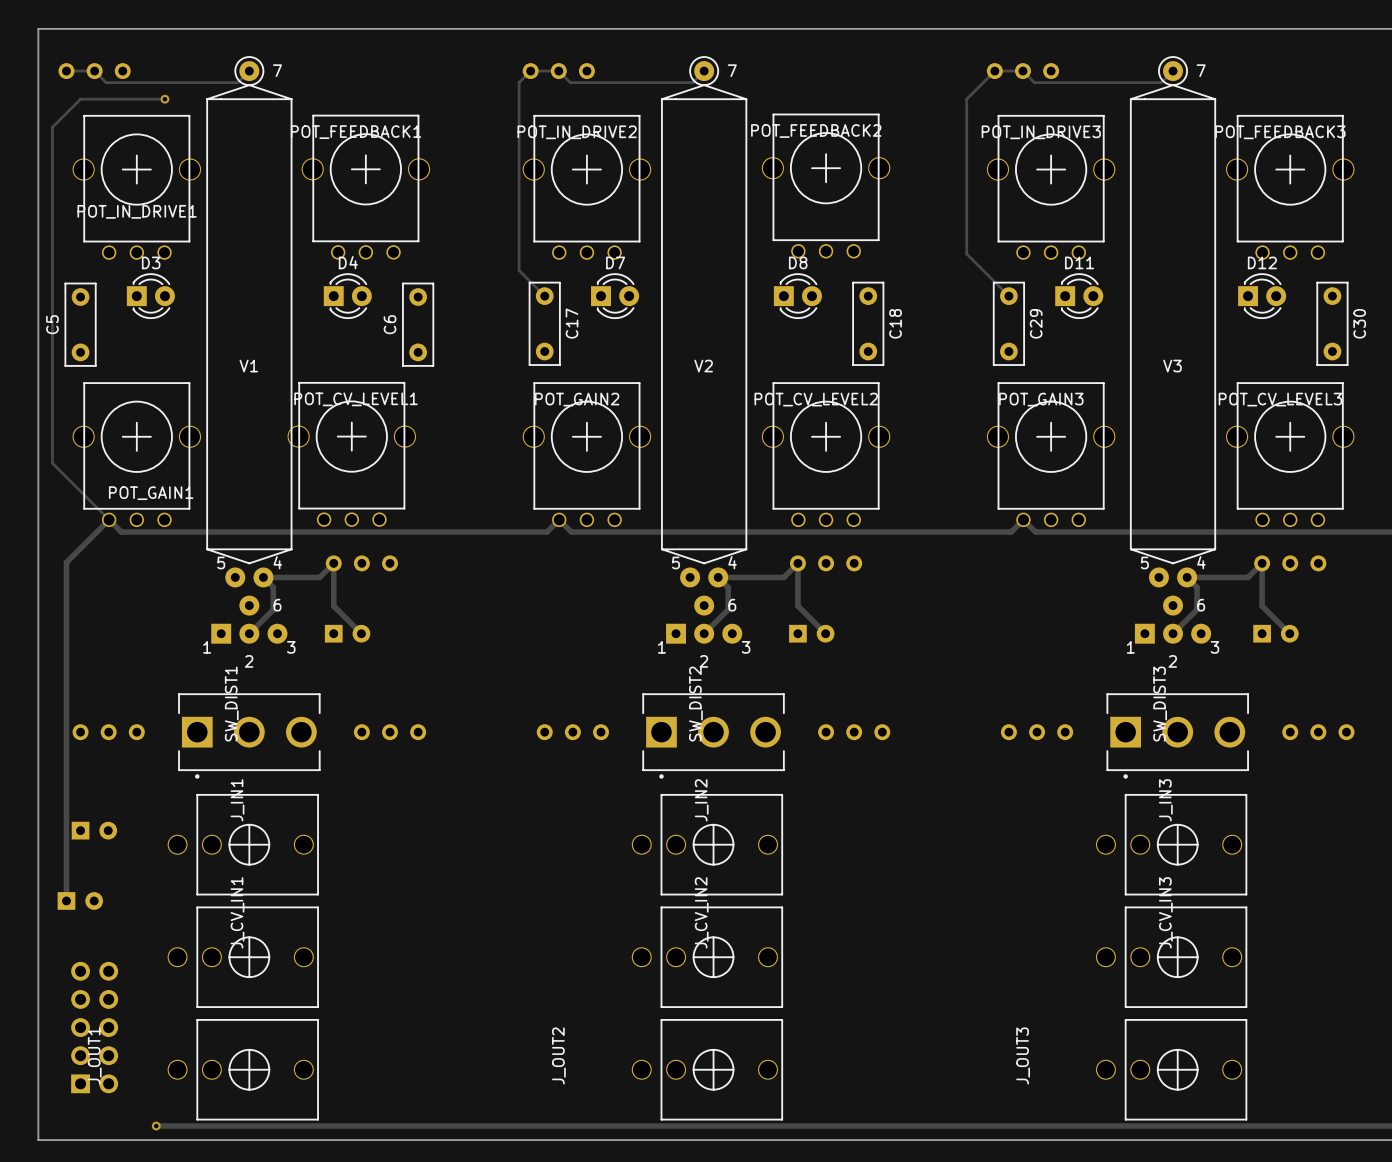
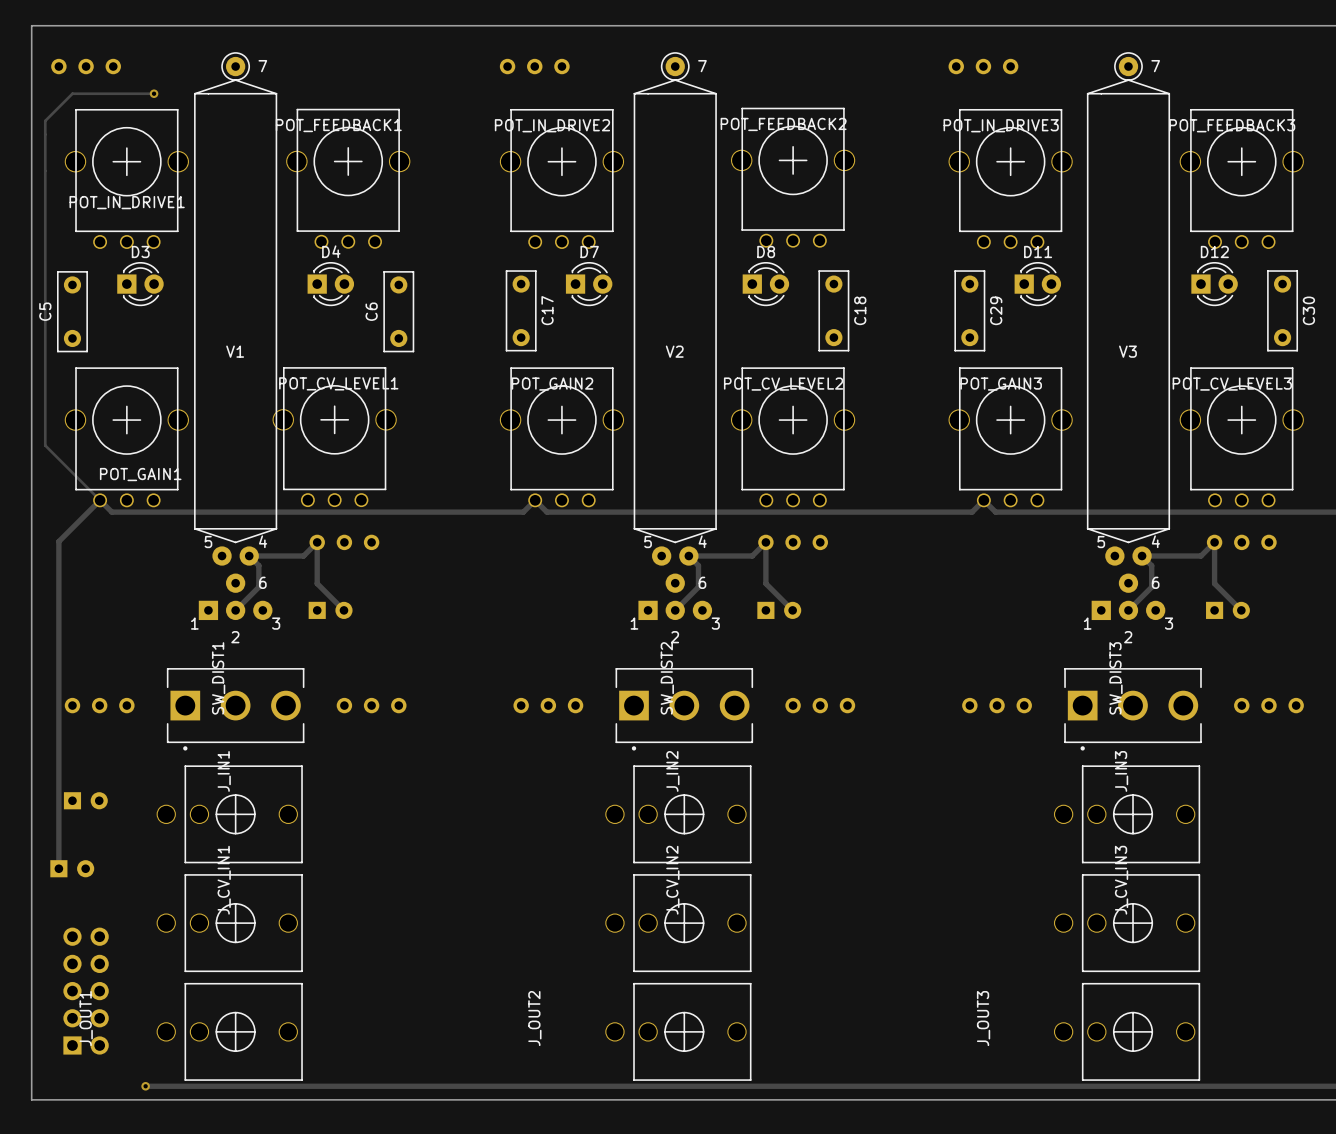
track: (66, 71) (94, 71) (106, 82) (237, 82) (249, 71) -> none
track: (704, 71) (692, 82) (570, 82) (558, 71) (530, 71) (519, 82) (519, 270) (544, 296) -> none
track: (1173, 71) (1161, 82) (1034, 82) (1022, 71) (994, 71) (966, 99) (966, 253) (1008, 296) -> none

